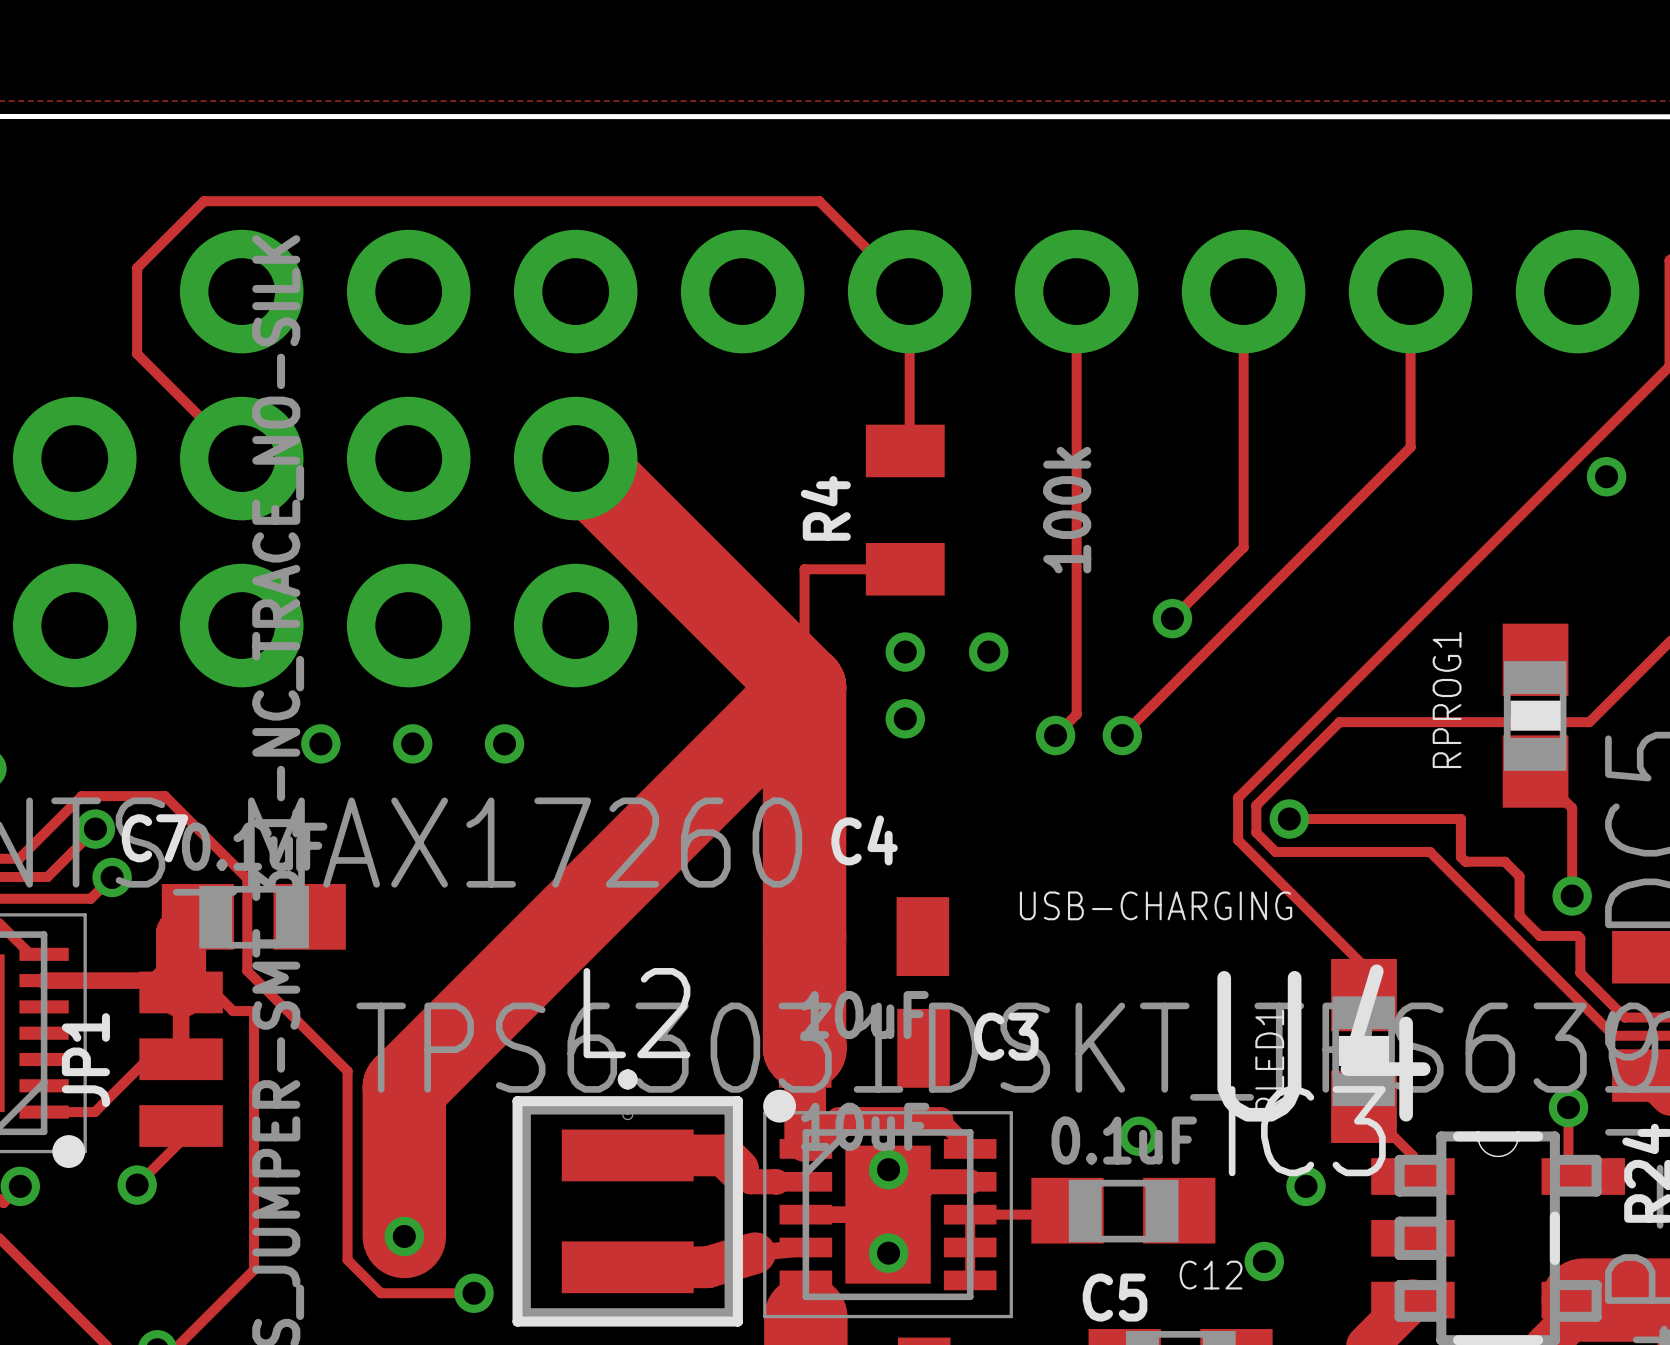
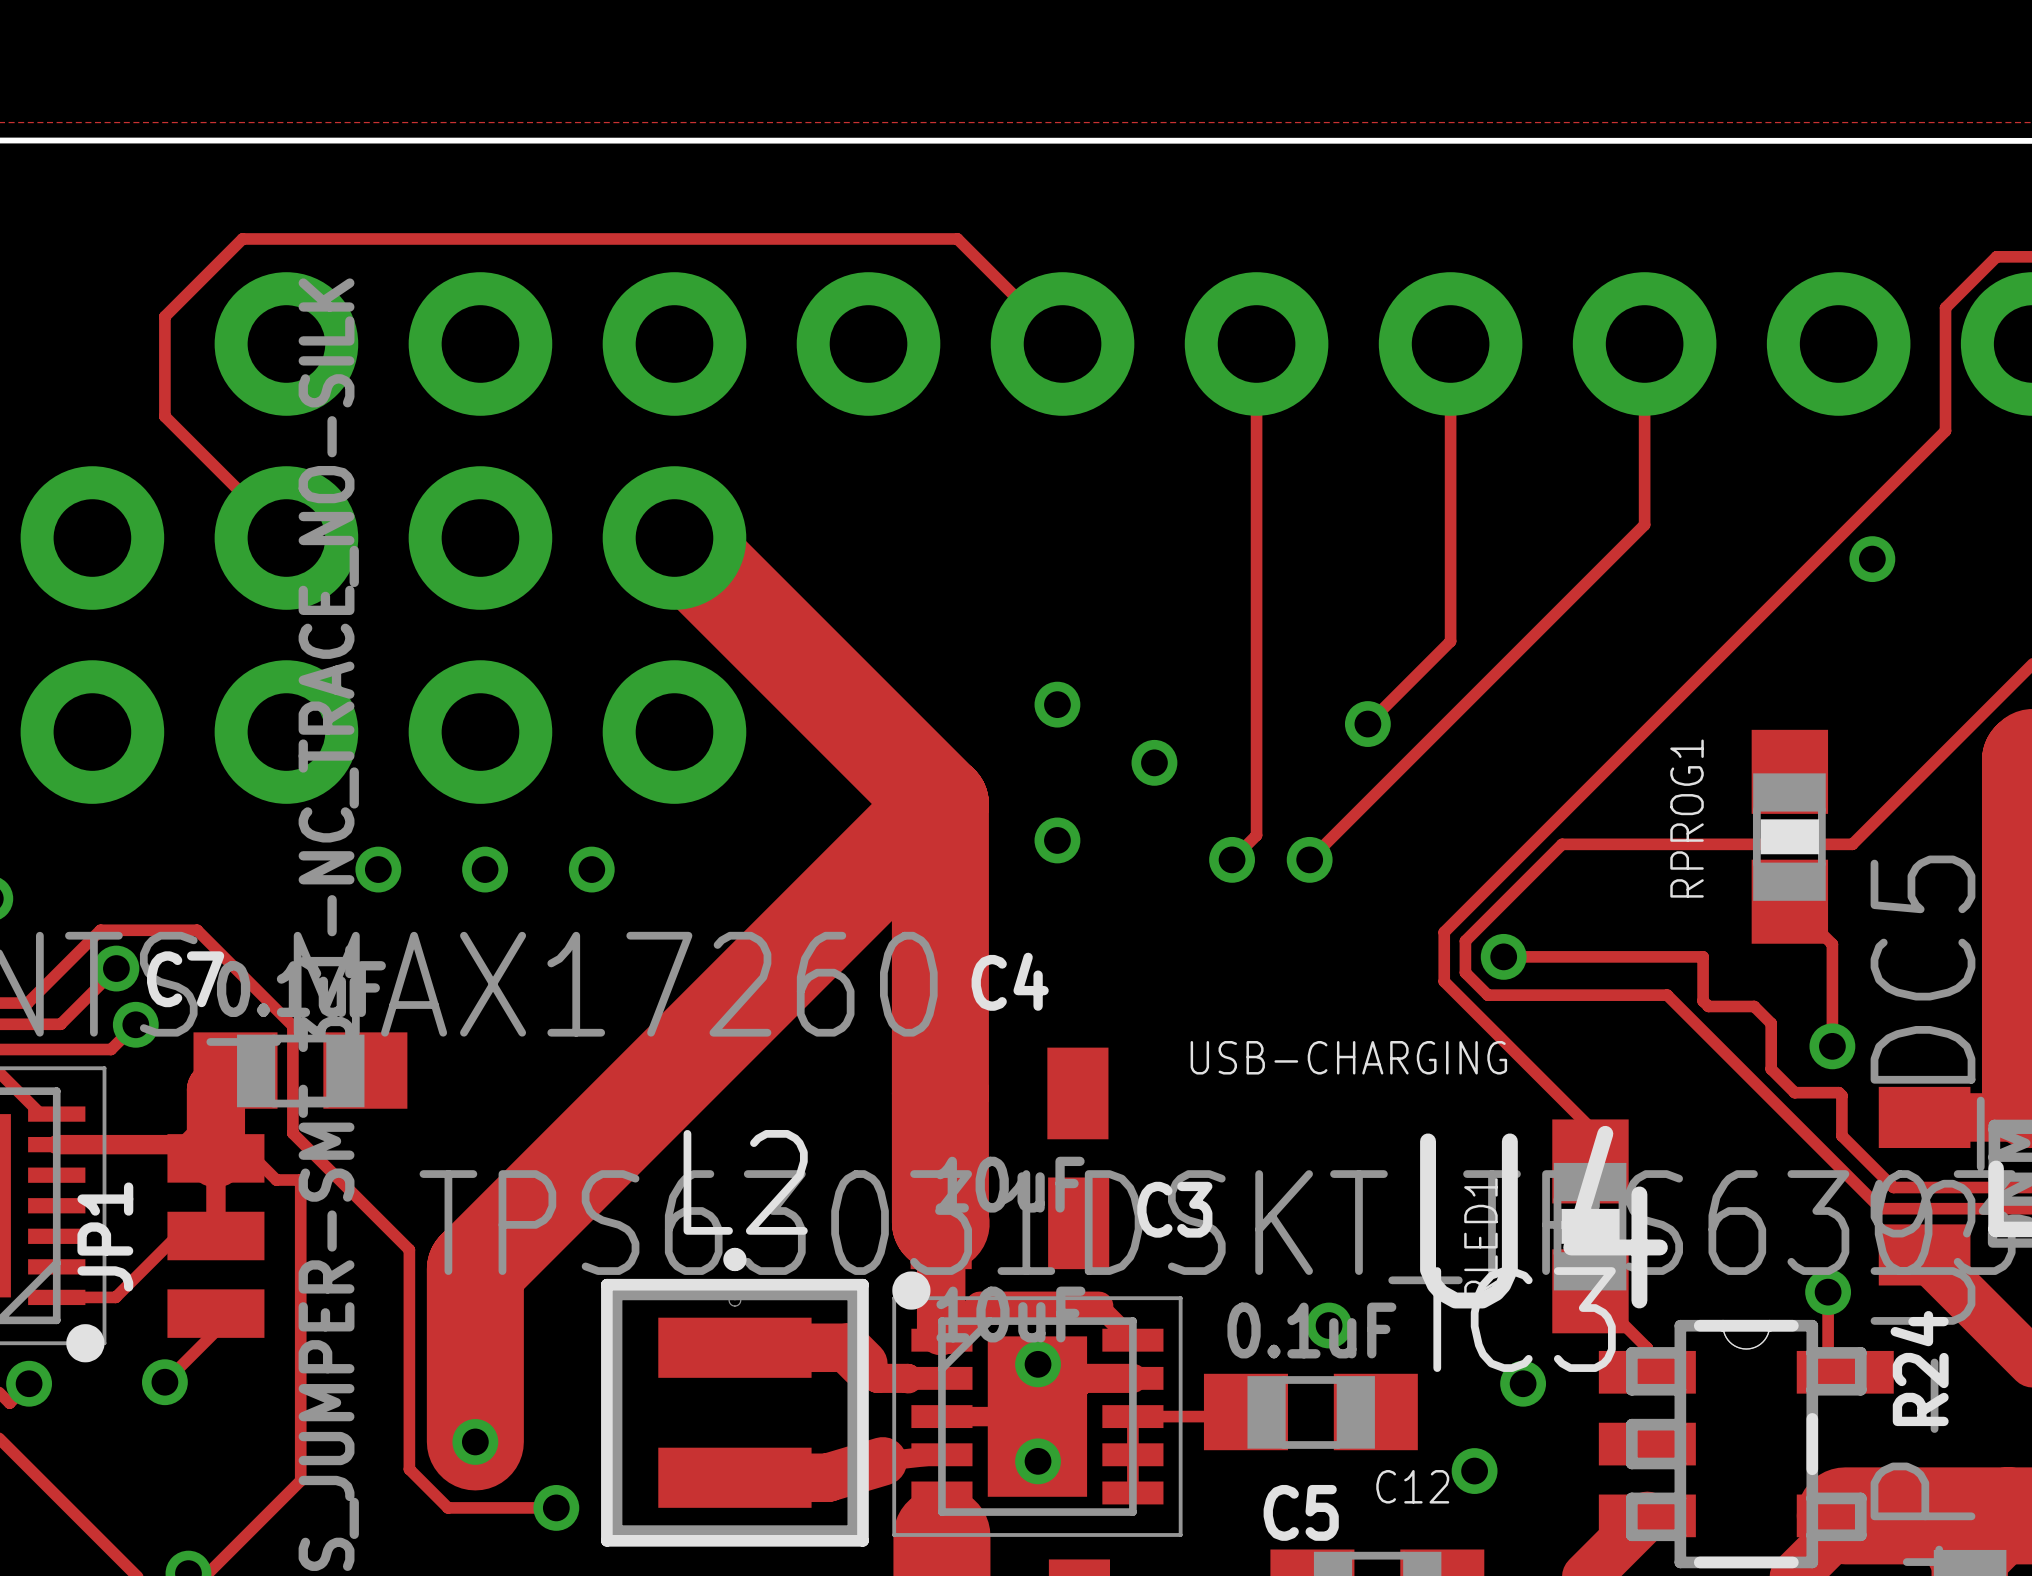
track: (909, 291) (909, 446) (905, 450) -> none
R4: 100k (905, 510) -> none
track: (905, 569) (804, 569) (804, 687) -> none
via position: (905, 652) -> (1057, 704)

